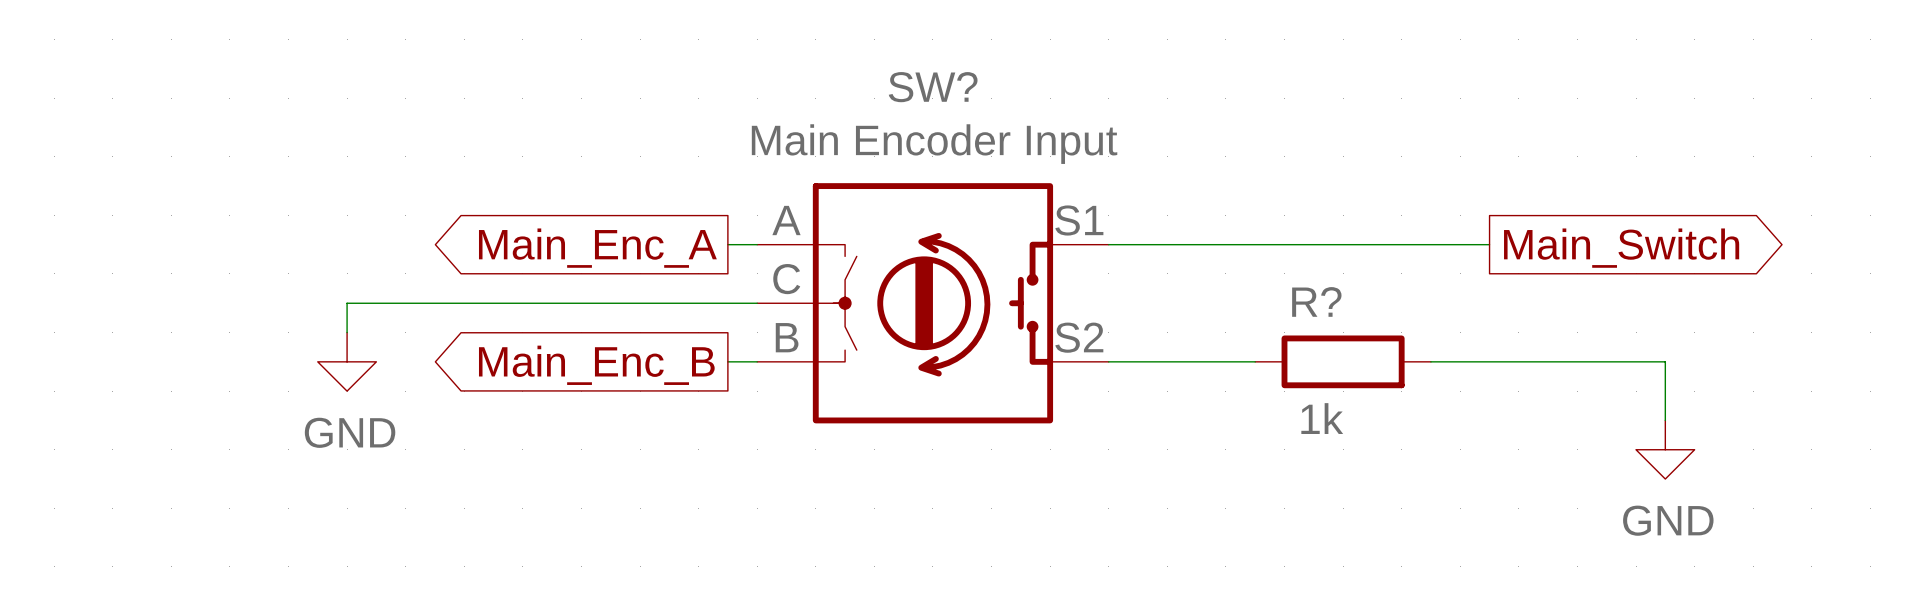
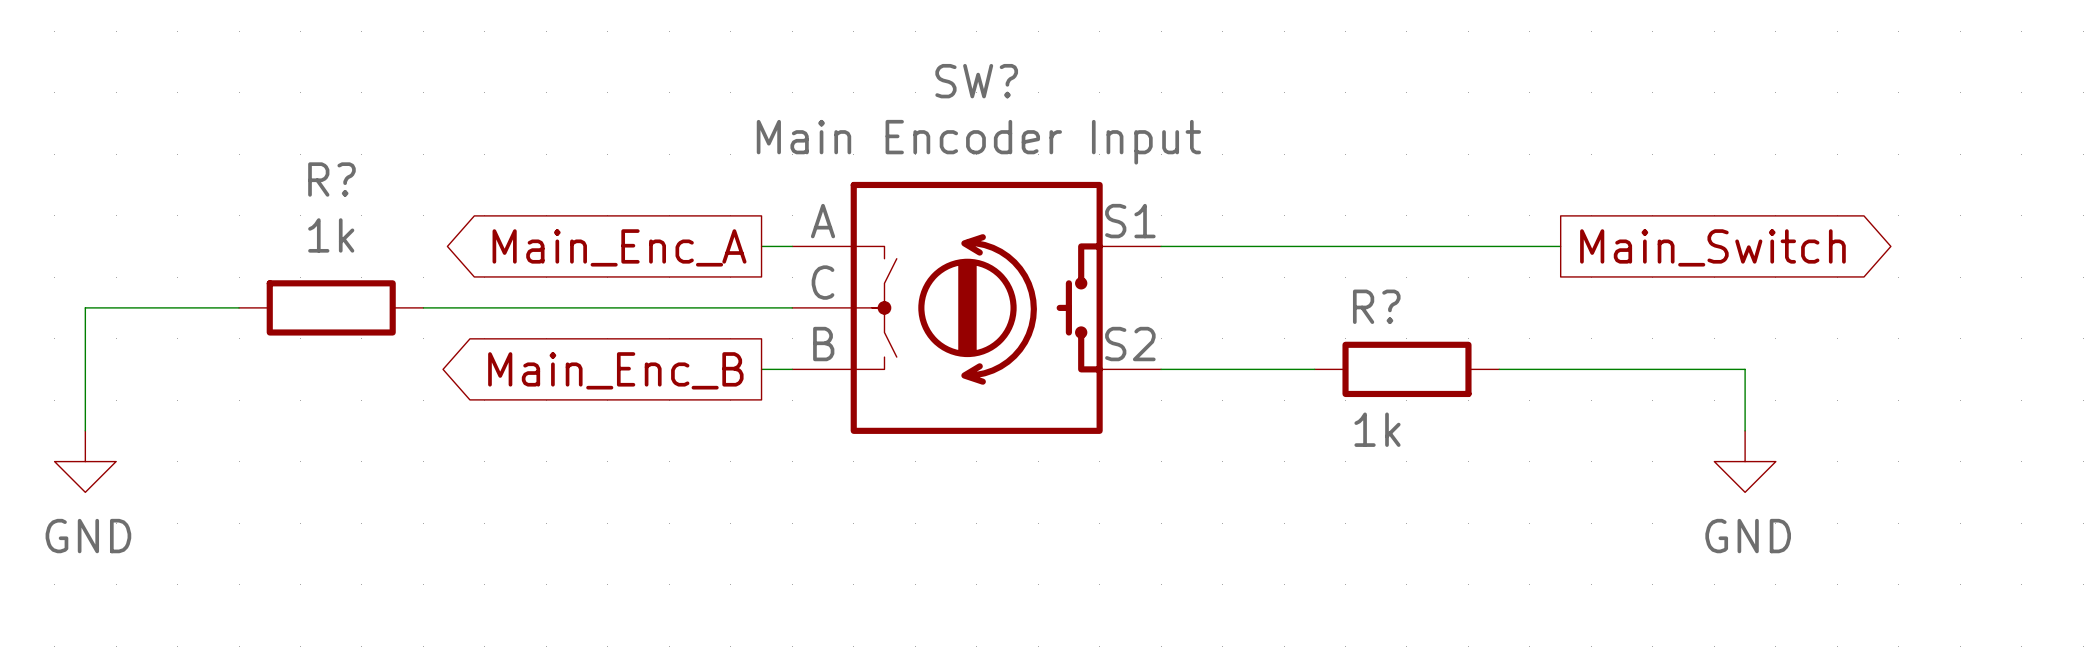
wire: none -> (239, 307) (85, 307) (85, 430)
R?: none -> 1k (331, 307)
wire: (405, 303) (347, 303) (347, 332) -> none
power symbol position: GND (347, 361) -> GND (85, 461)

